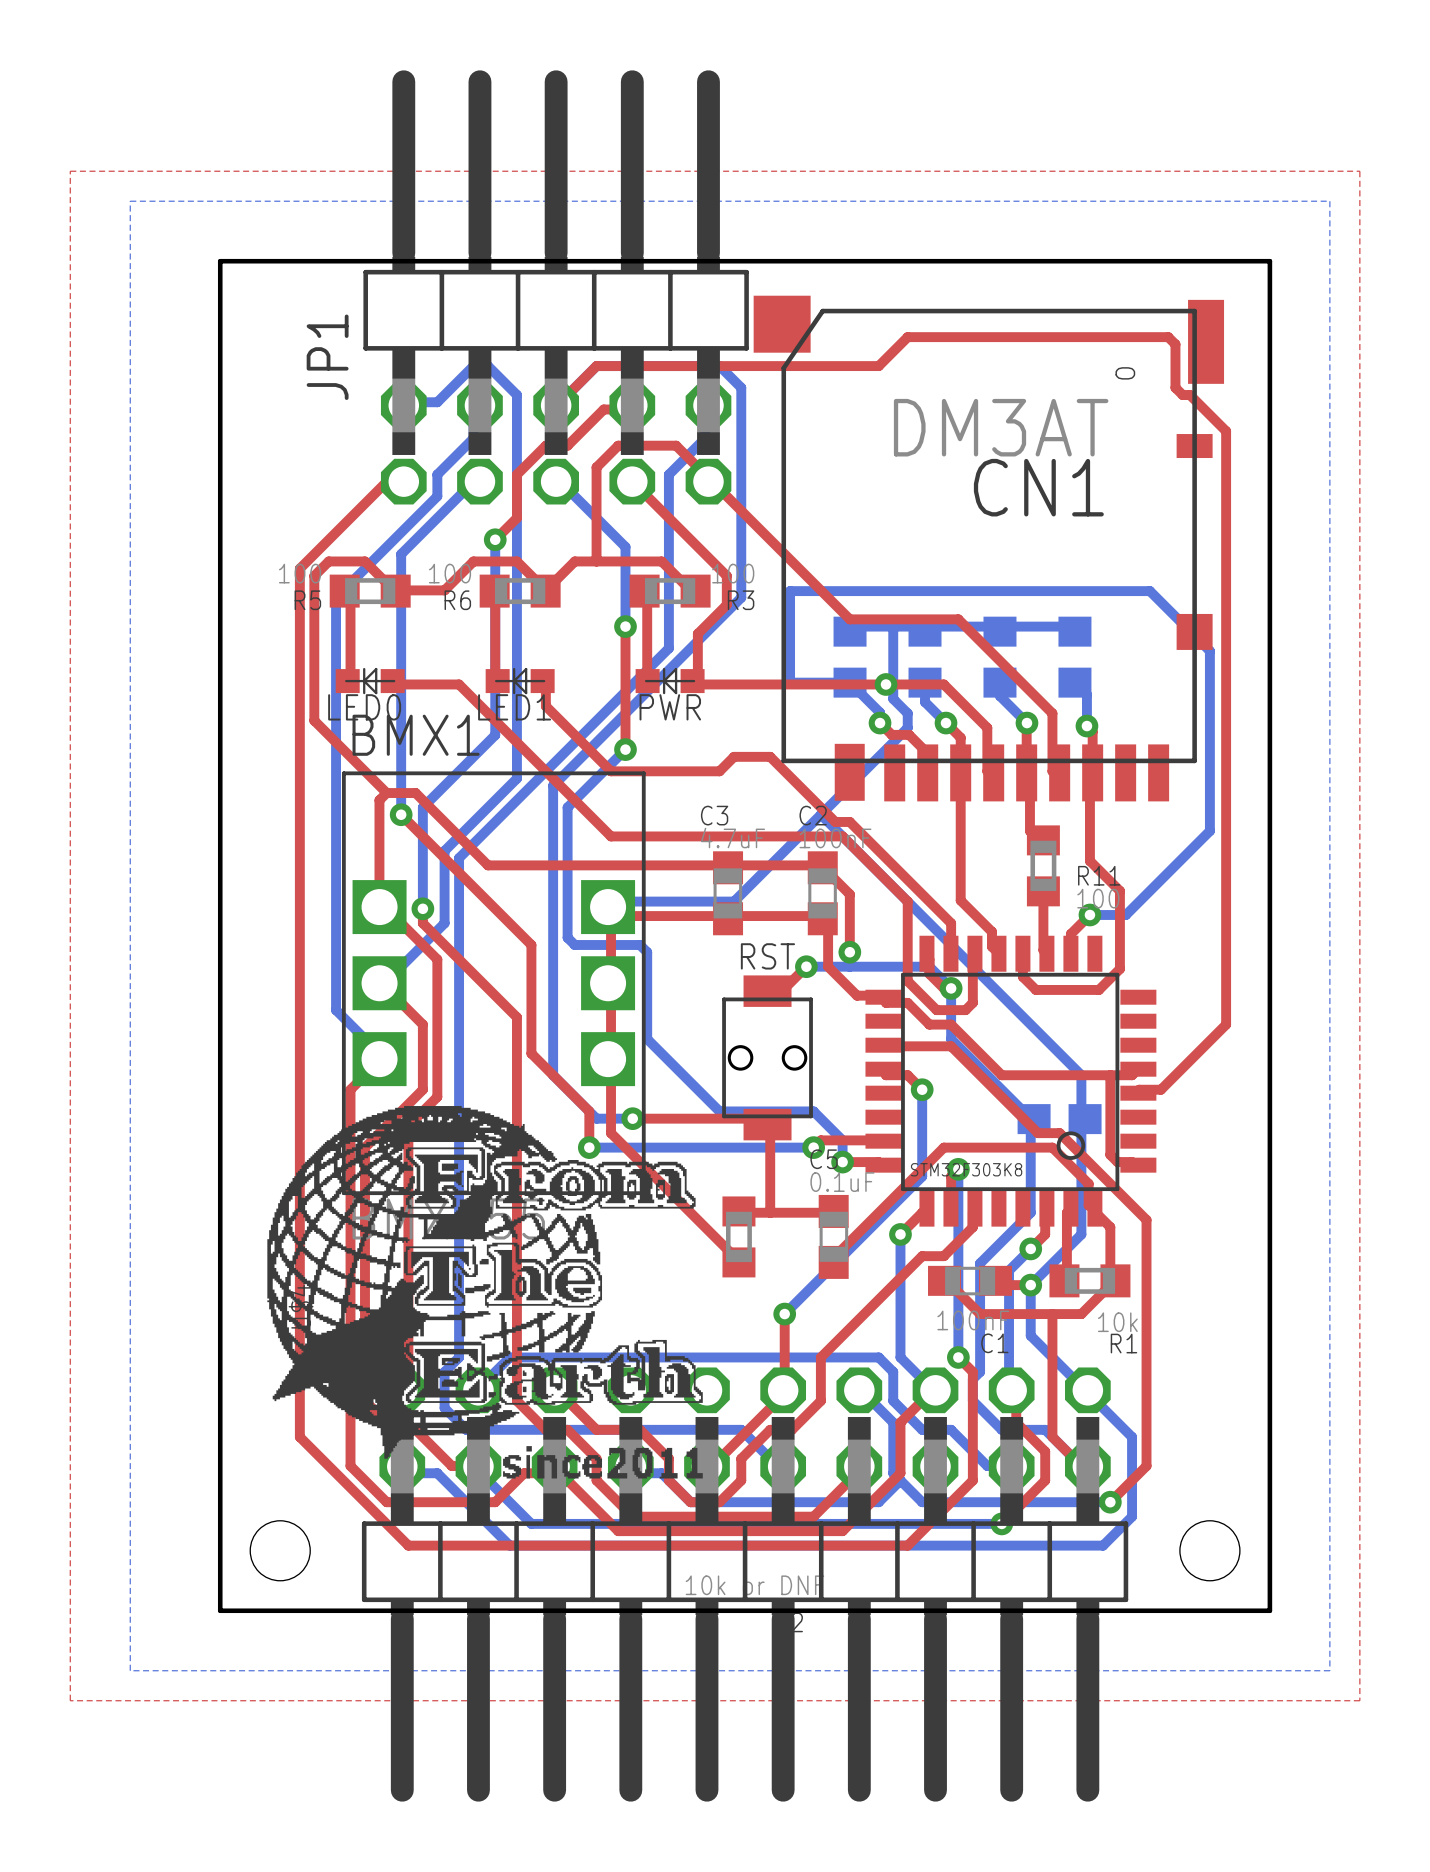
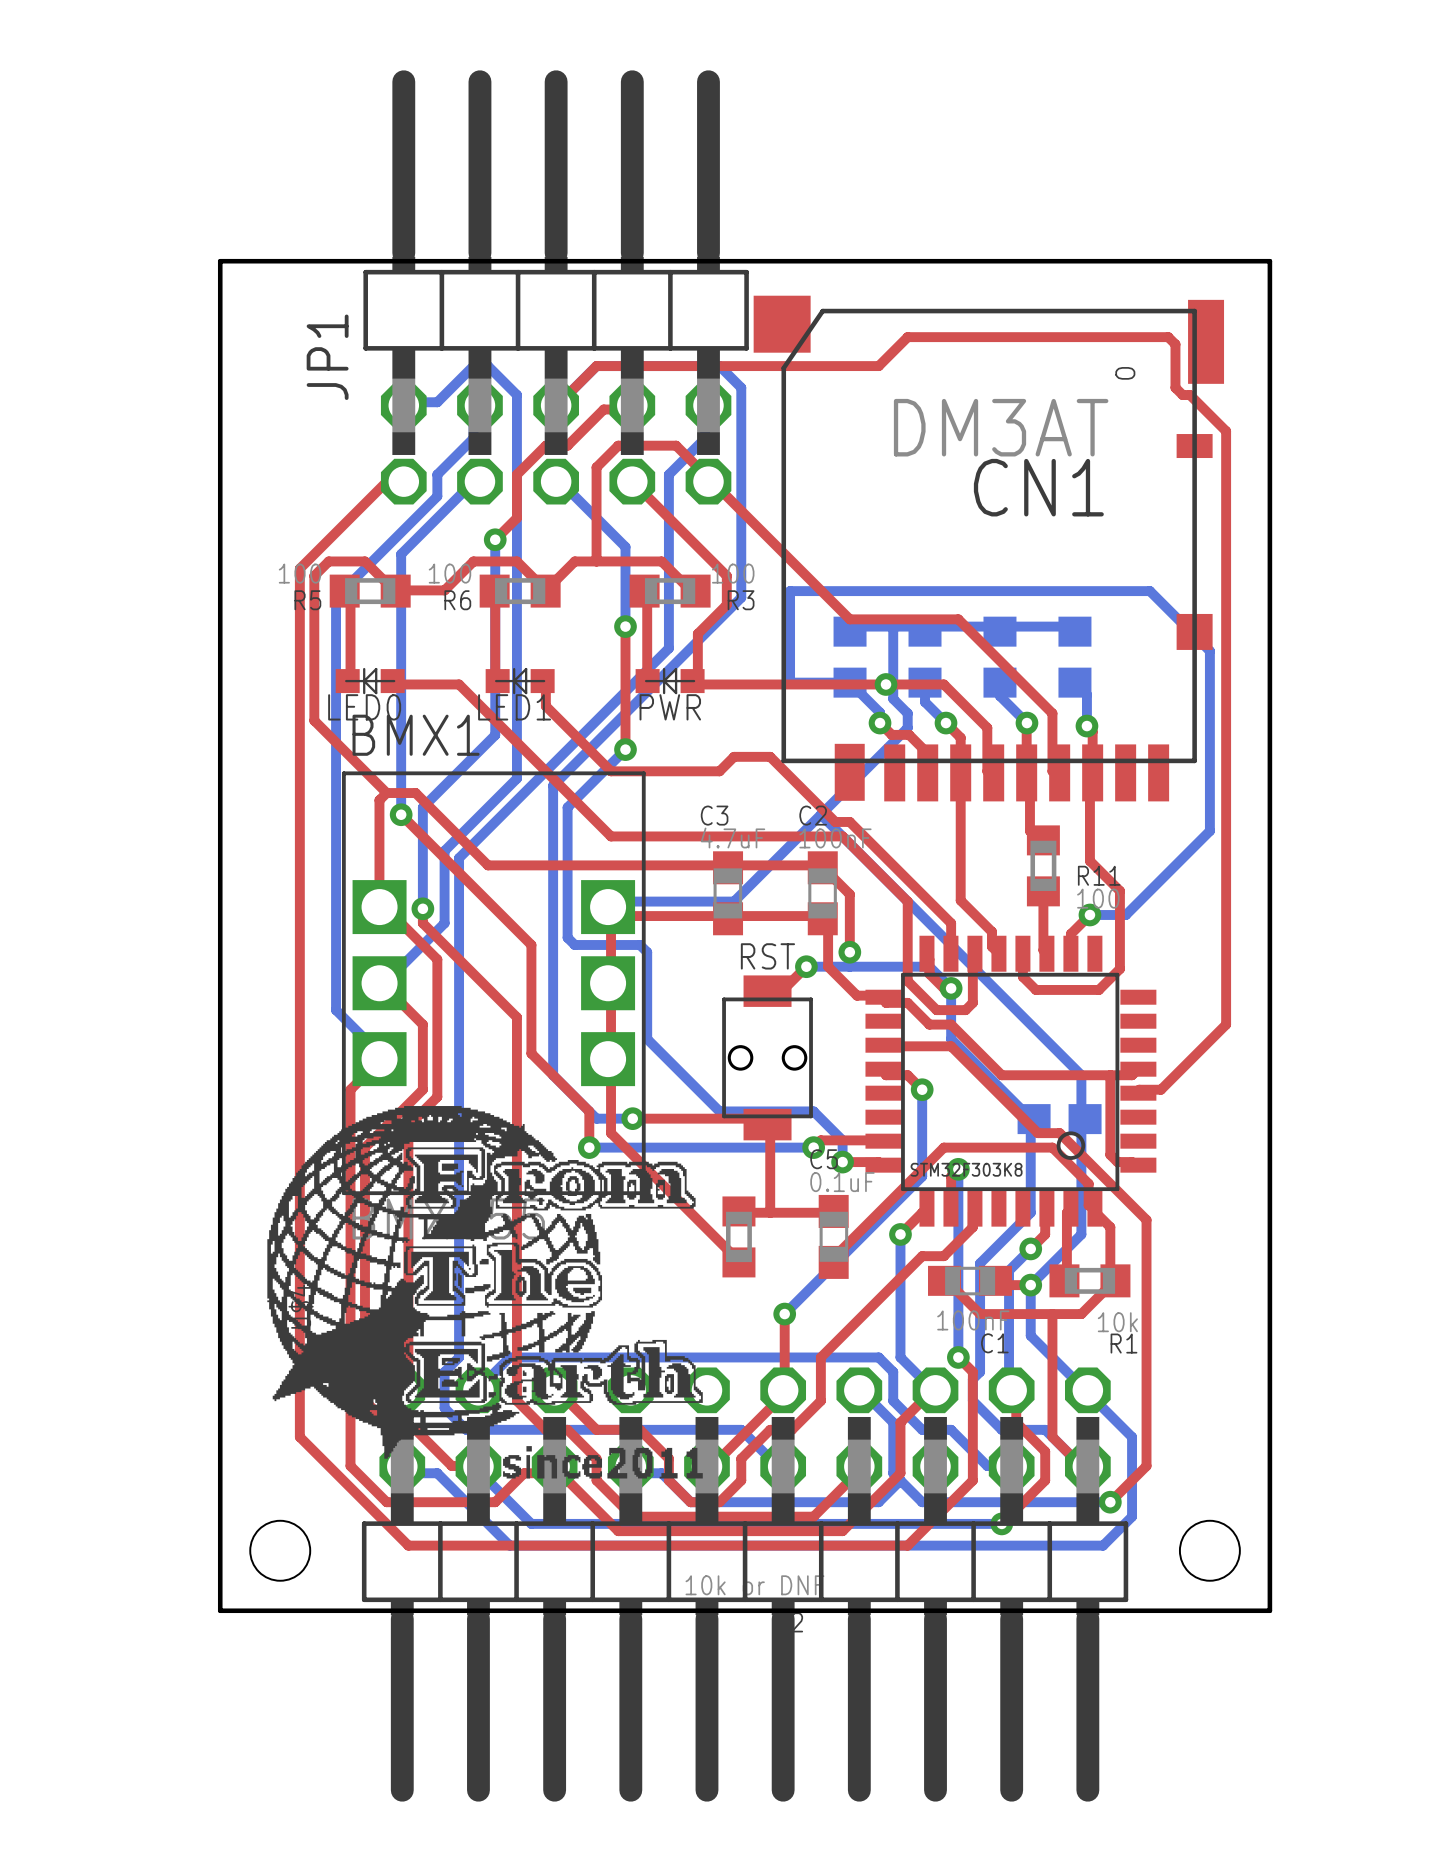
top zone outline: (70, 171) (1359, 171) (1359, 1700) (70, 1700) (70, 171) -> none
bottom zone outline: (130, 201) (1329, 201) (1329, 1670) (130, 1670) (130, 201) -> none

